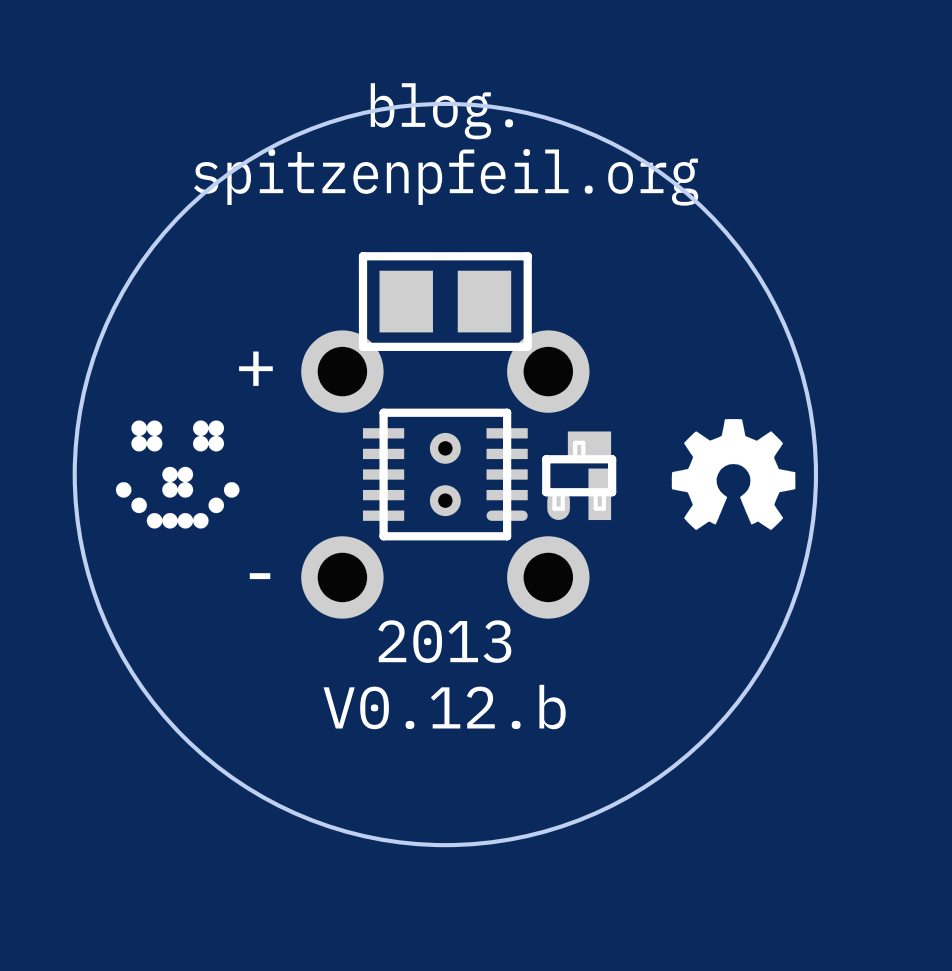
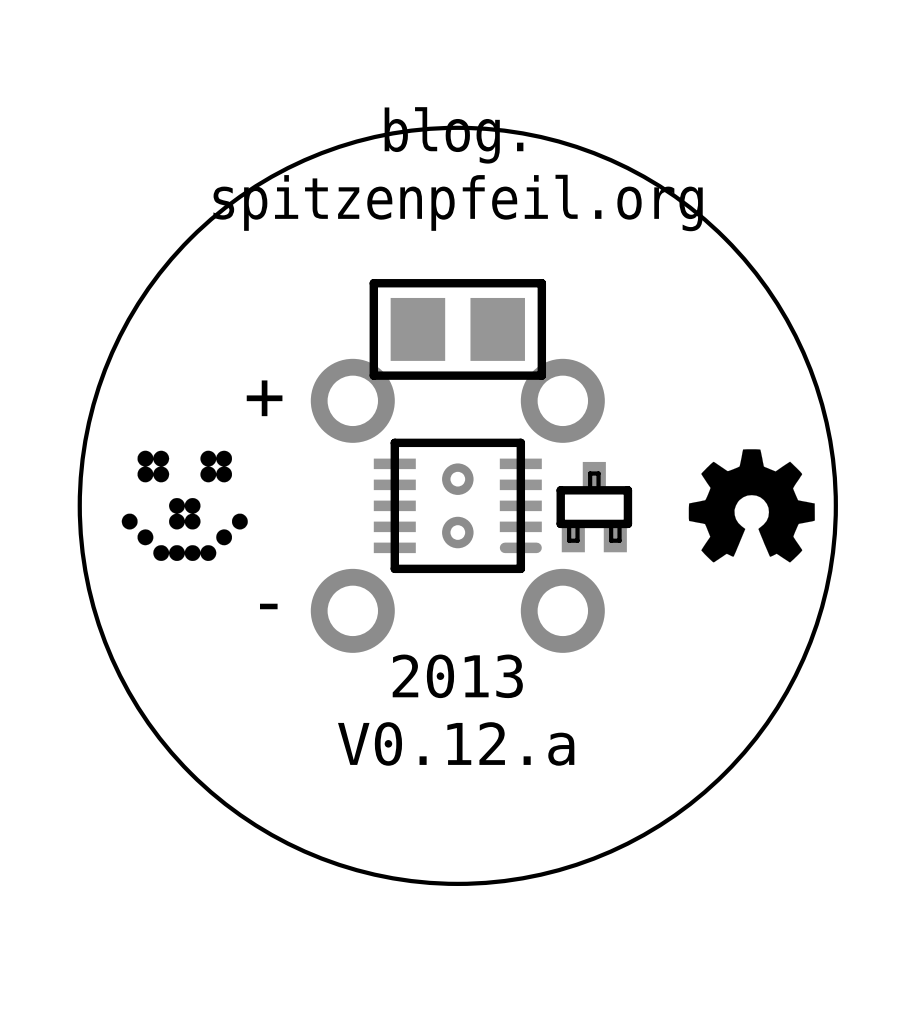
part footprint: [542, 431, 617, 521] -> [556, 461, 633, 553]
text: V0.12.b (444, 707) -> V0.12.a (456, 743)

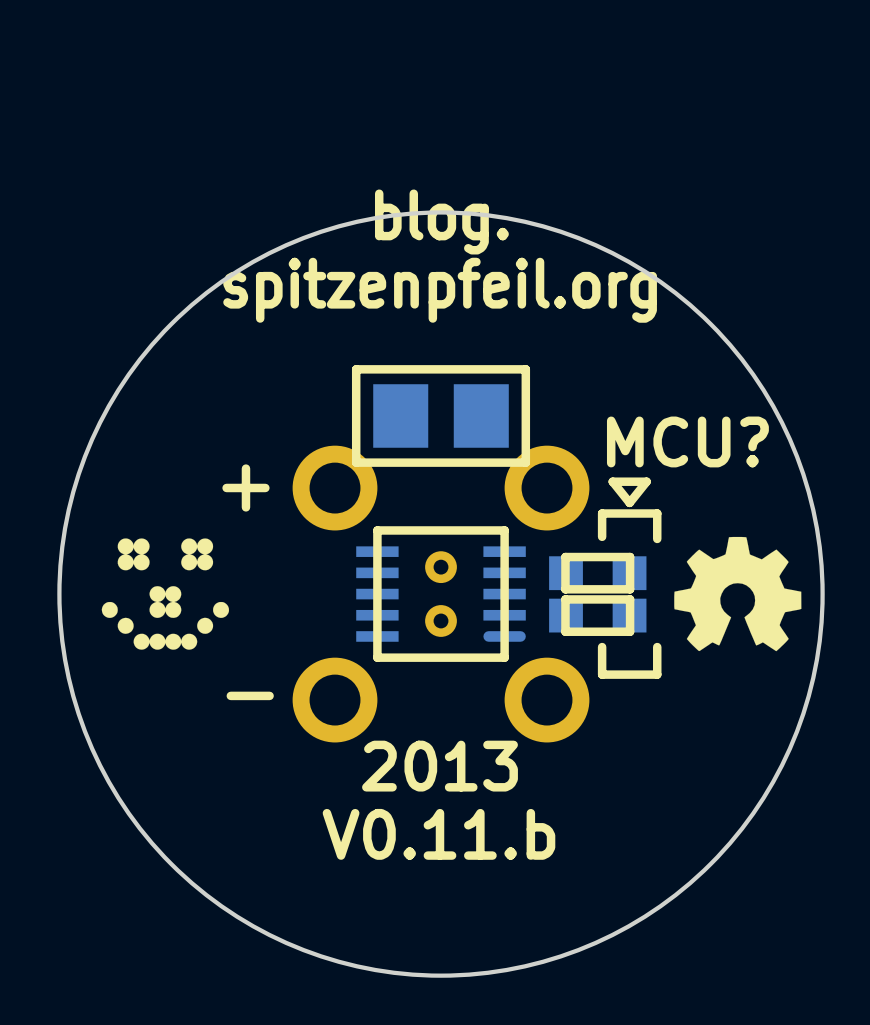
text: none -> MCU? (687, 441)
line: none -> (646, 481) (629, 502) (612, 481) (646, 481)
line: none -> (602, 536) (602, 513) (657, 513) (657, 538)
part: none -> (597, 573)
part: (594, 507) -> none
part: none -> (597, 615)
line: none -> (657, 647) (657, 674) (602, 674) (602, 647)
text: V0.12.a (456, 743) -> V0.11.b (438, 834)

